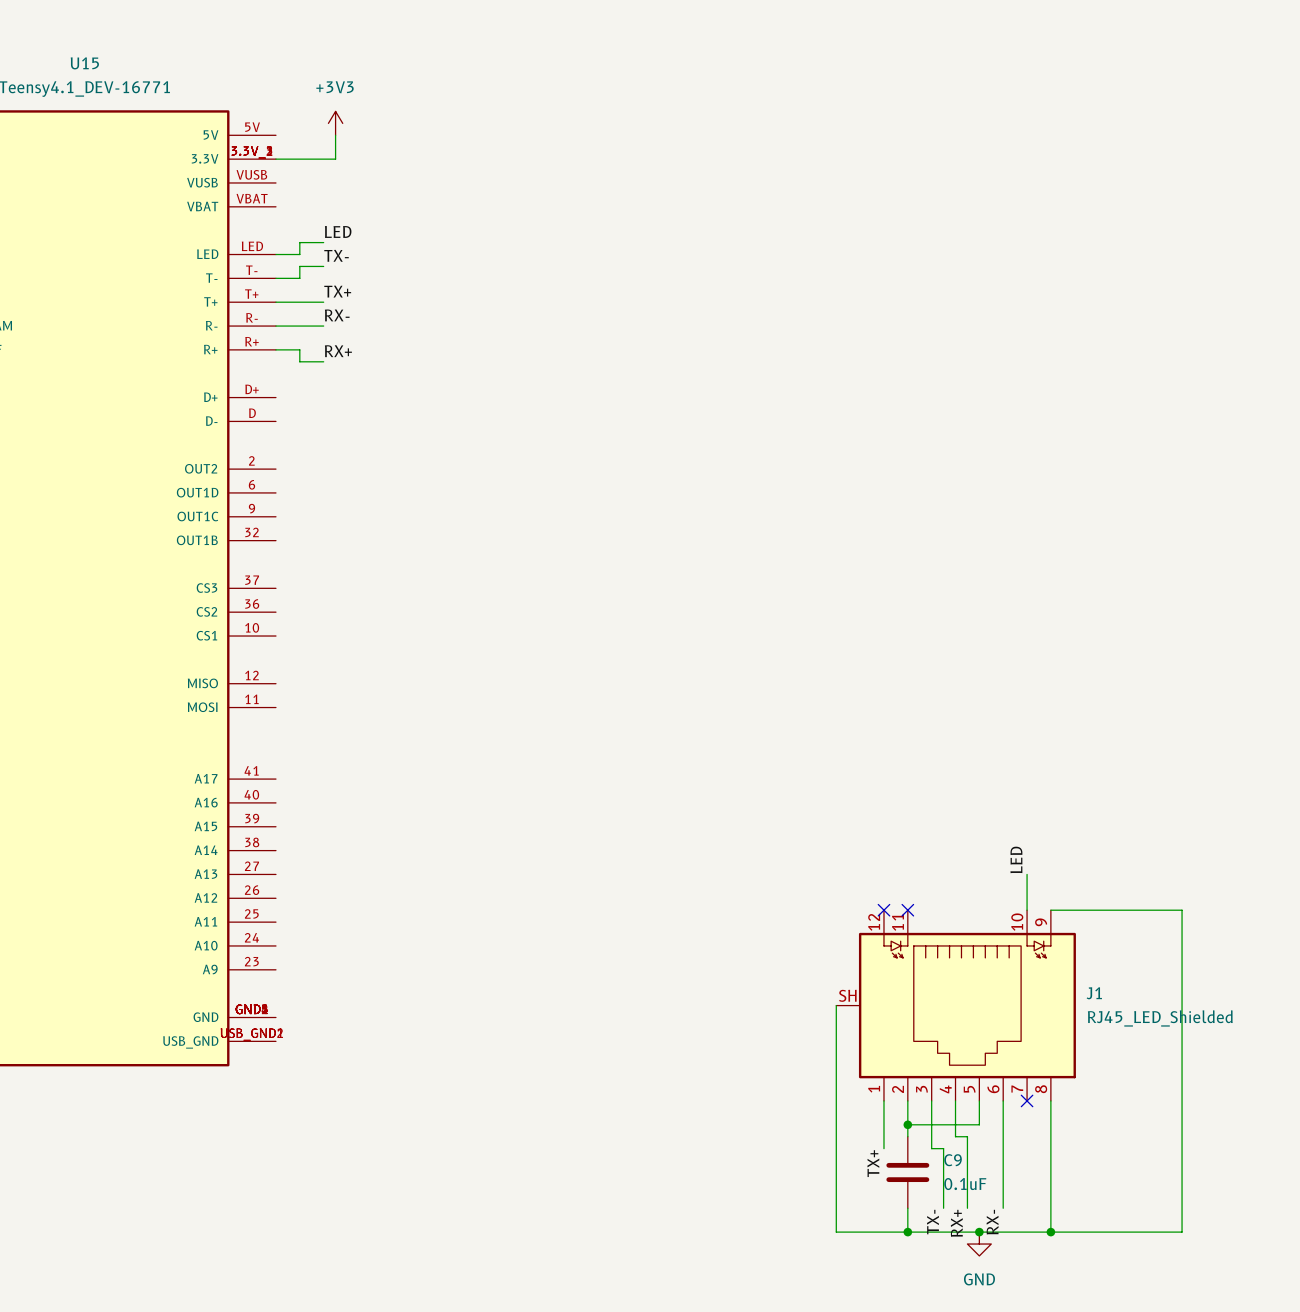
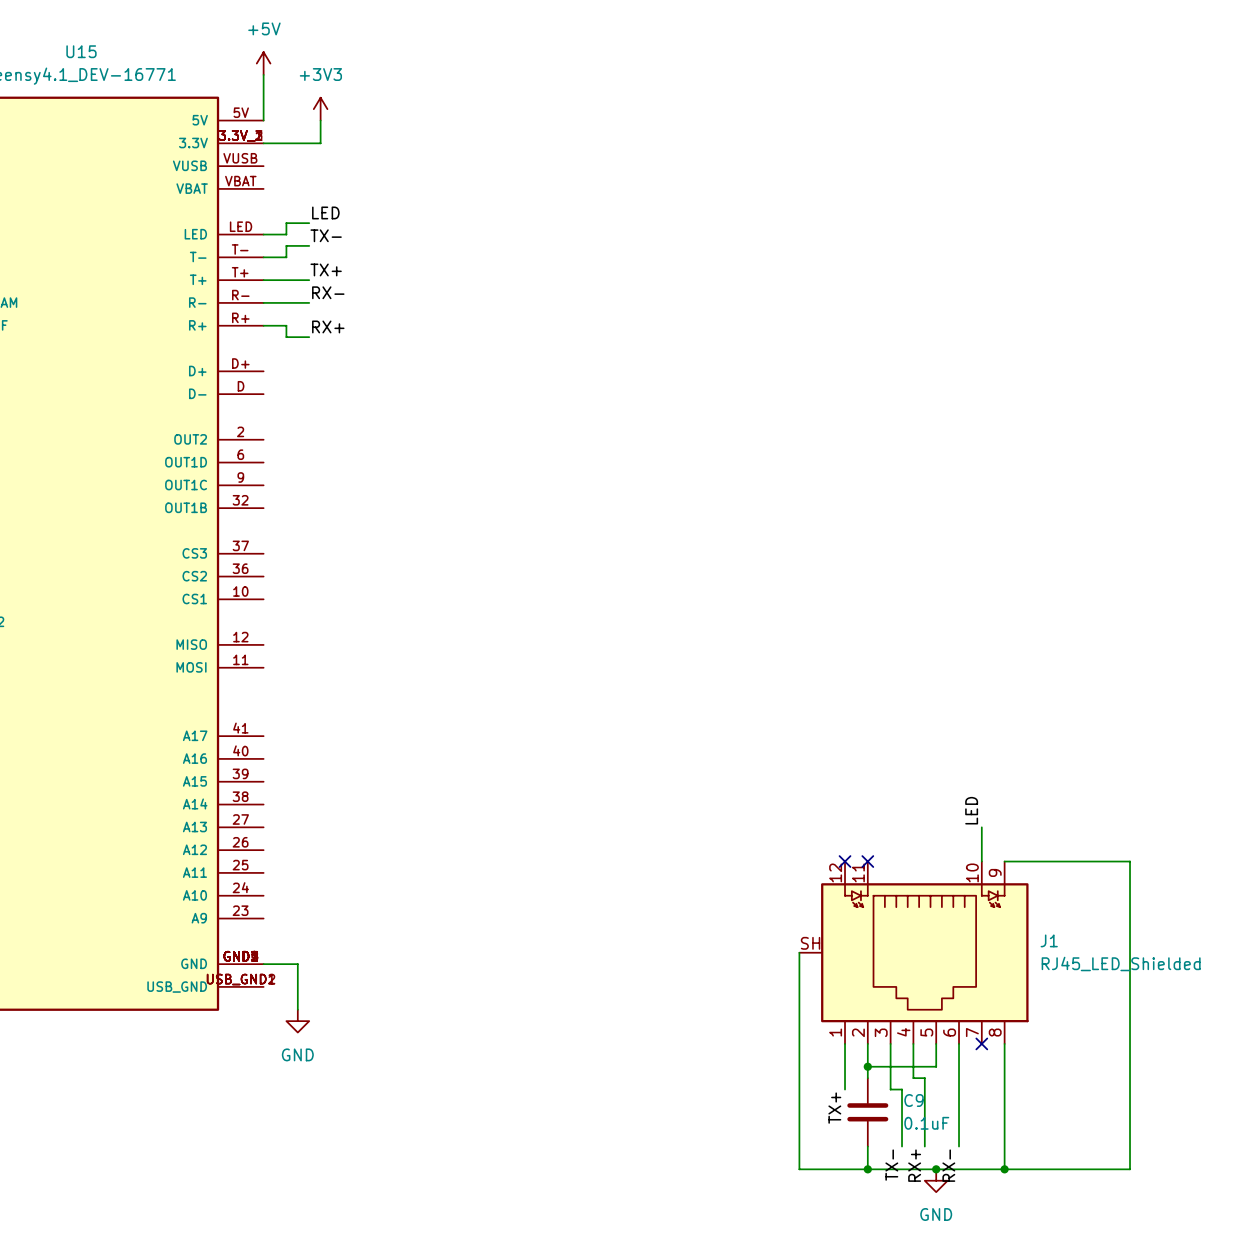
power symbol: none -> +5V (263, 63)
wire: none -> (263, 74) (263, 120)
wire: none -> (263, 964) (297, 964) (297, 1009)
power symbol: none -> GND (297, 1021)

